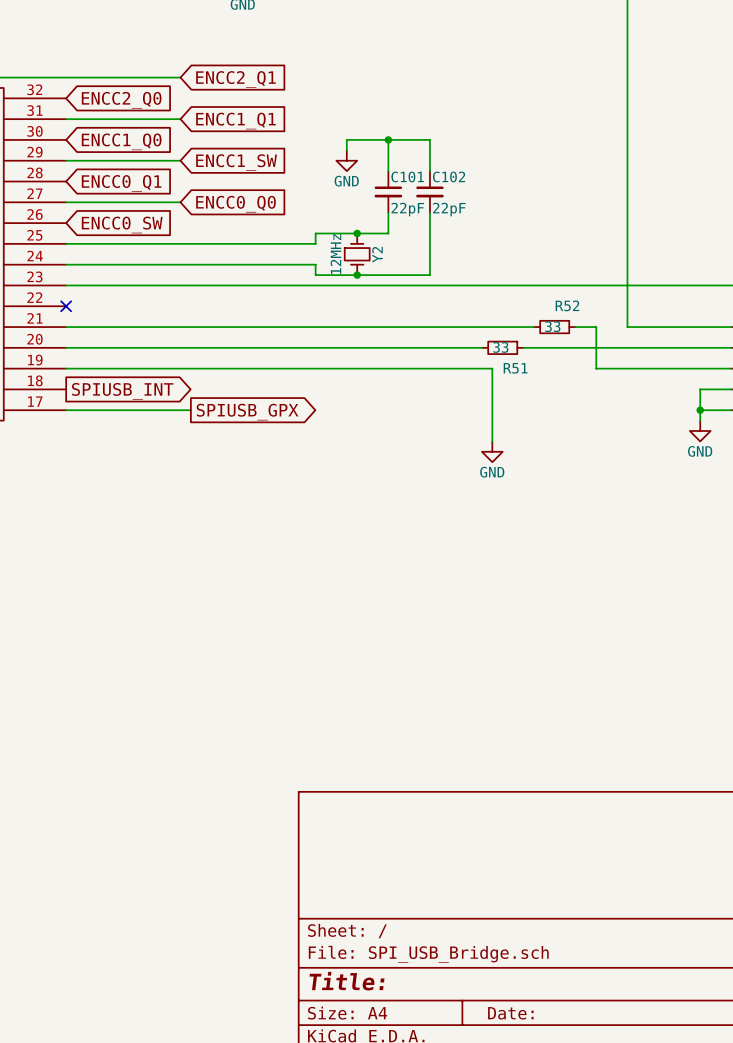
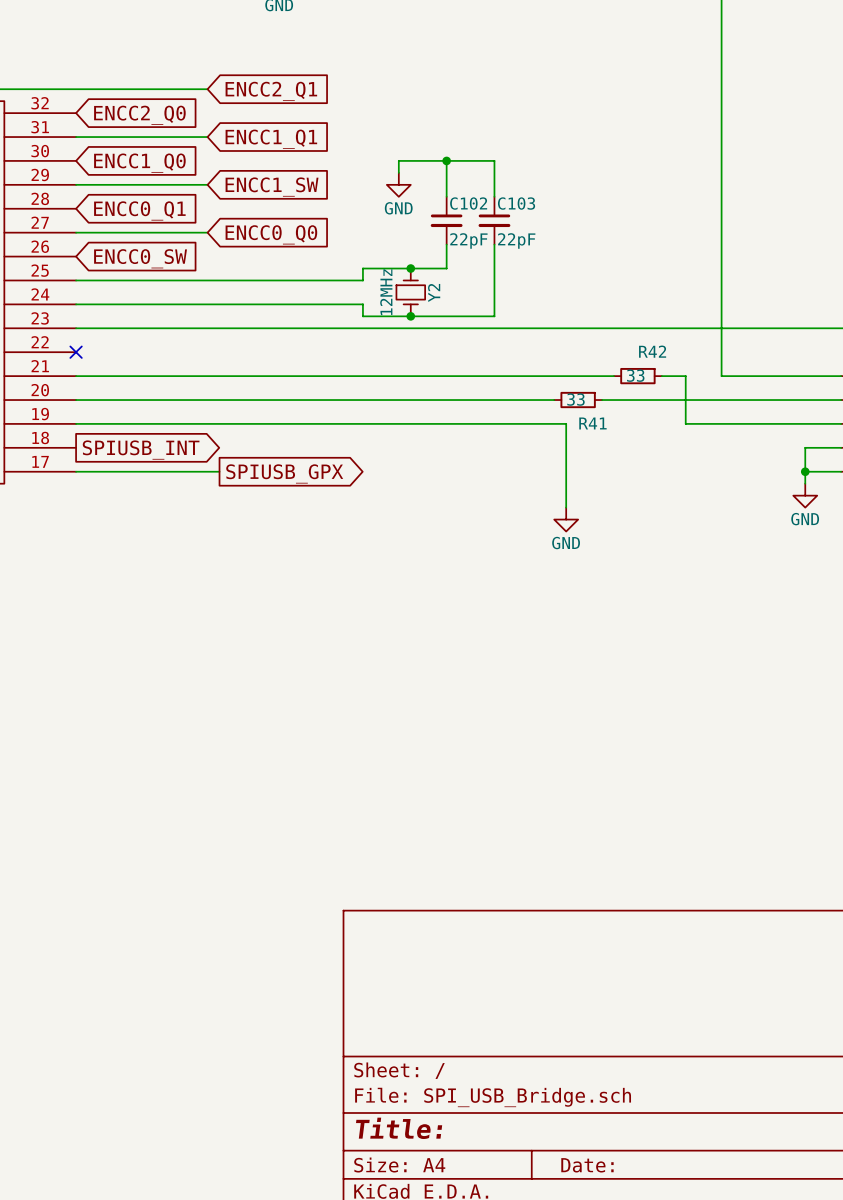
C101 name: C101 (407, 176) -> C102 (468, 203)
C102 name: C102 (449, 176) -> C103 (516, 203)
R52 name: R52 (567, 305) -> R42 (652, 351)
R51 name: R51 (515, 368) -> R41 (592, 423)

